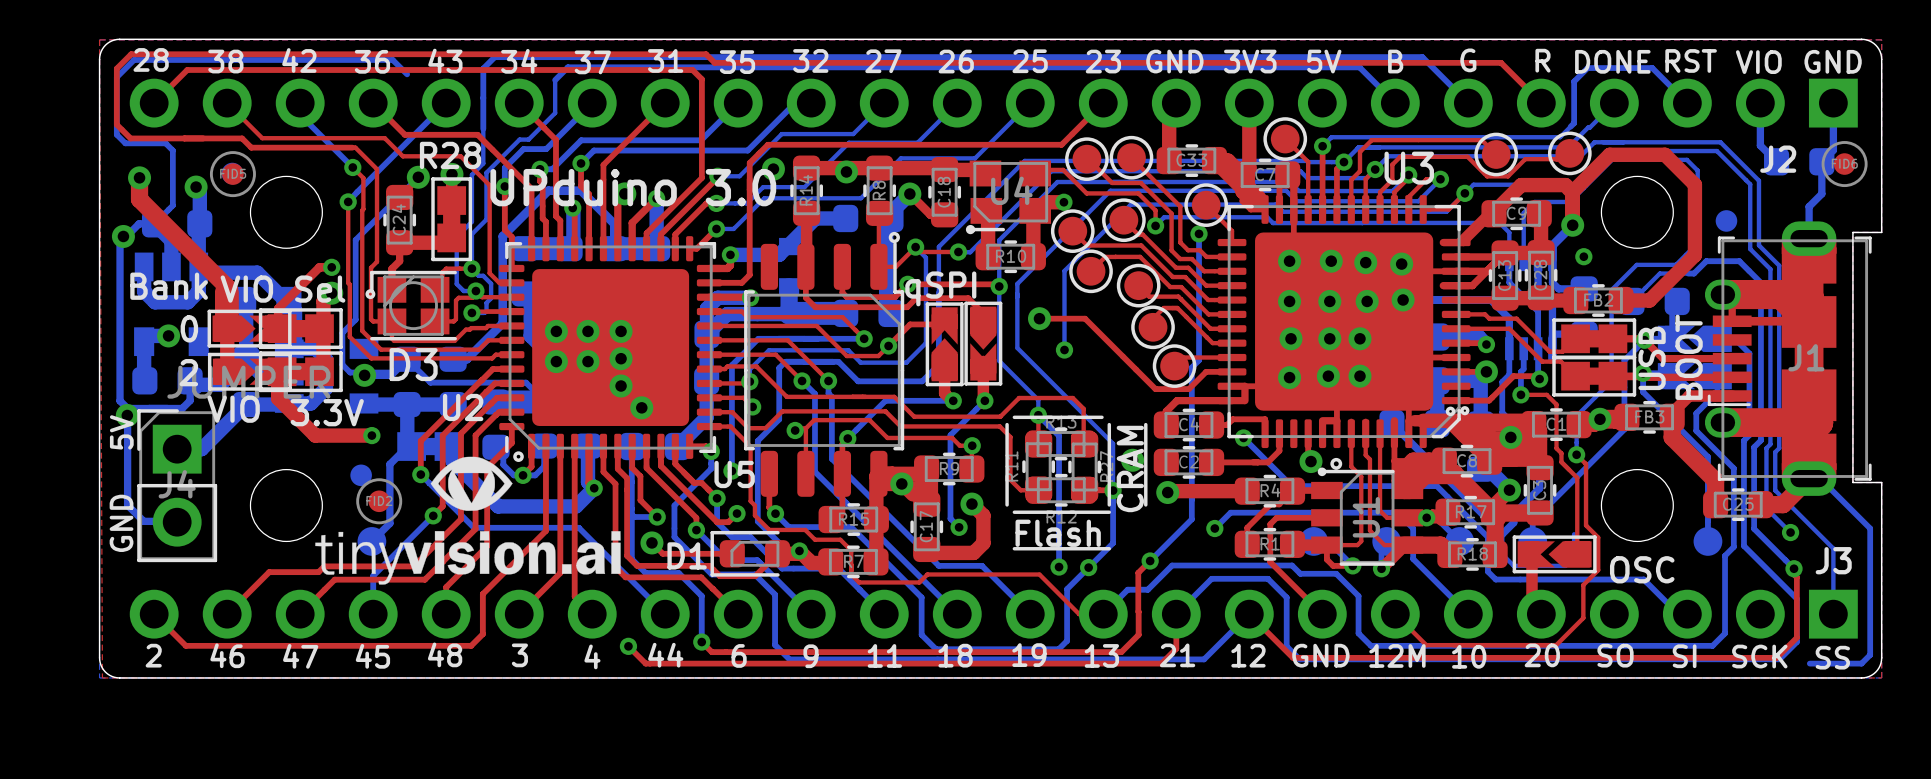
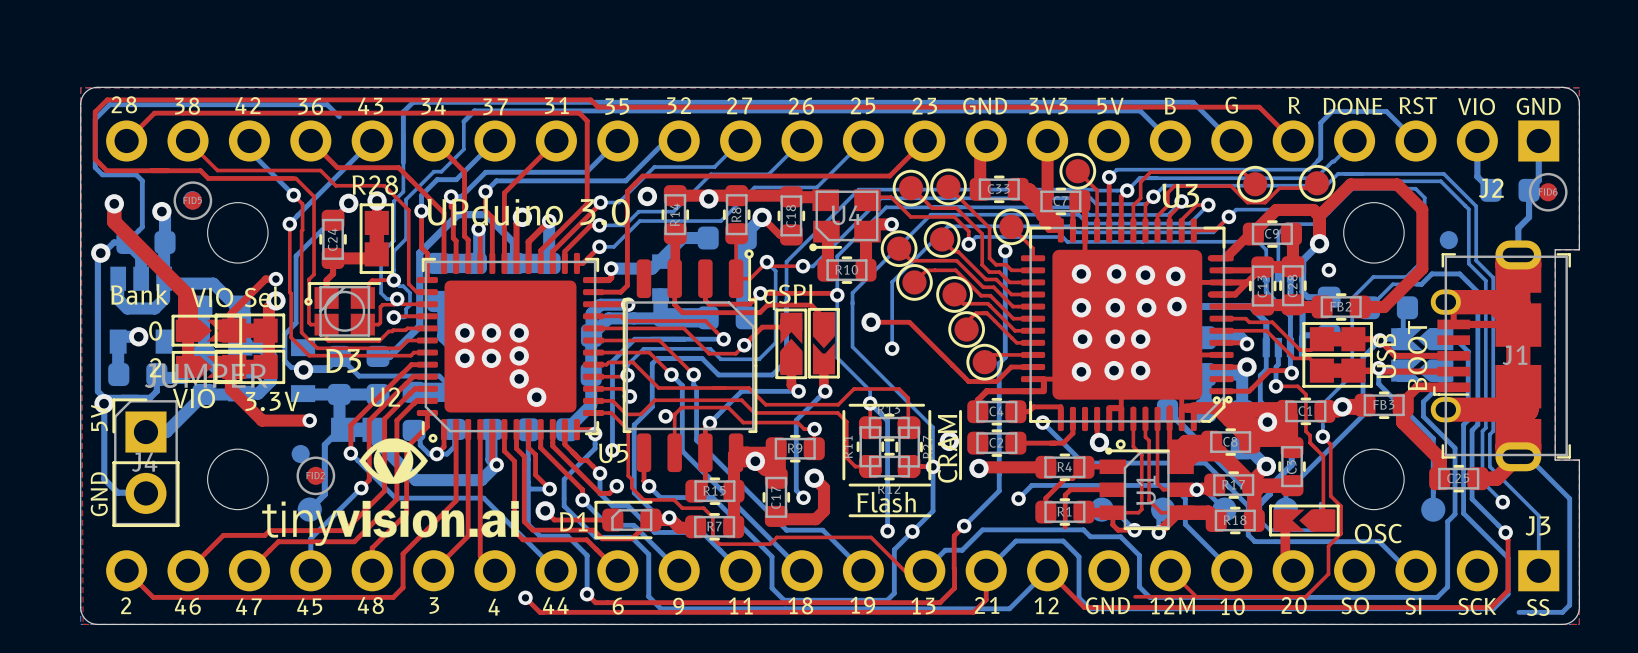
top track: (1270, 562) (1322, 614) -> none
top track: none -> (1135, 596) (1196, 596)

